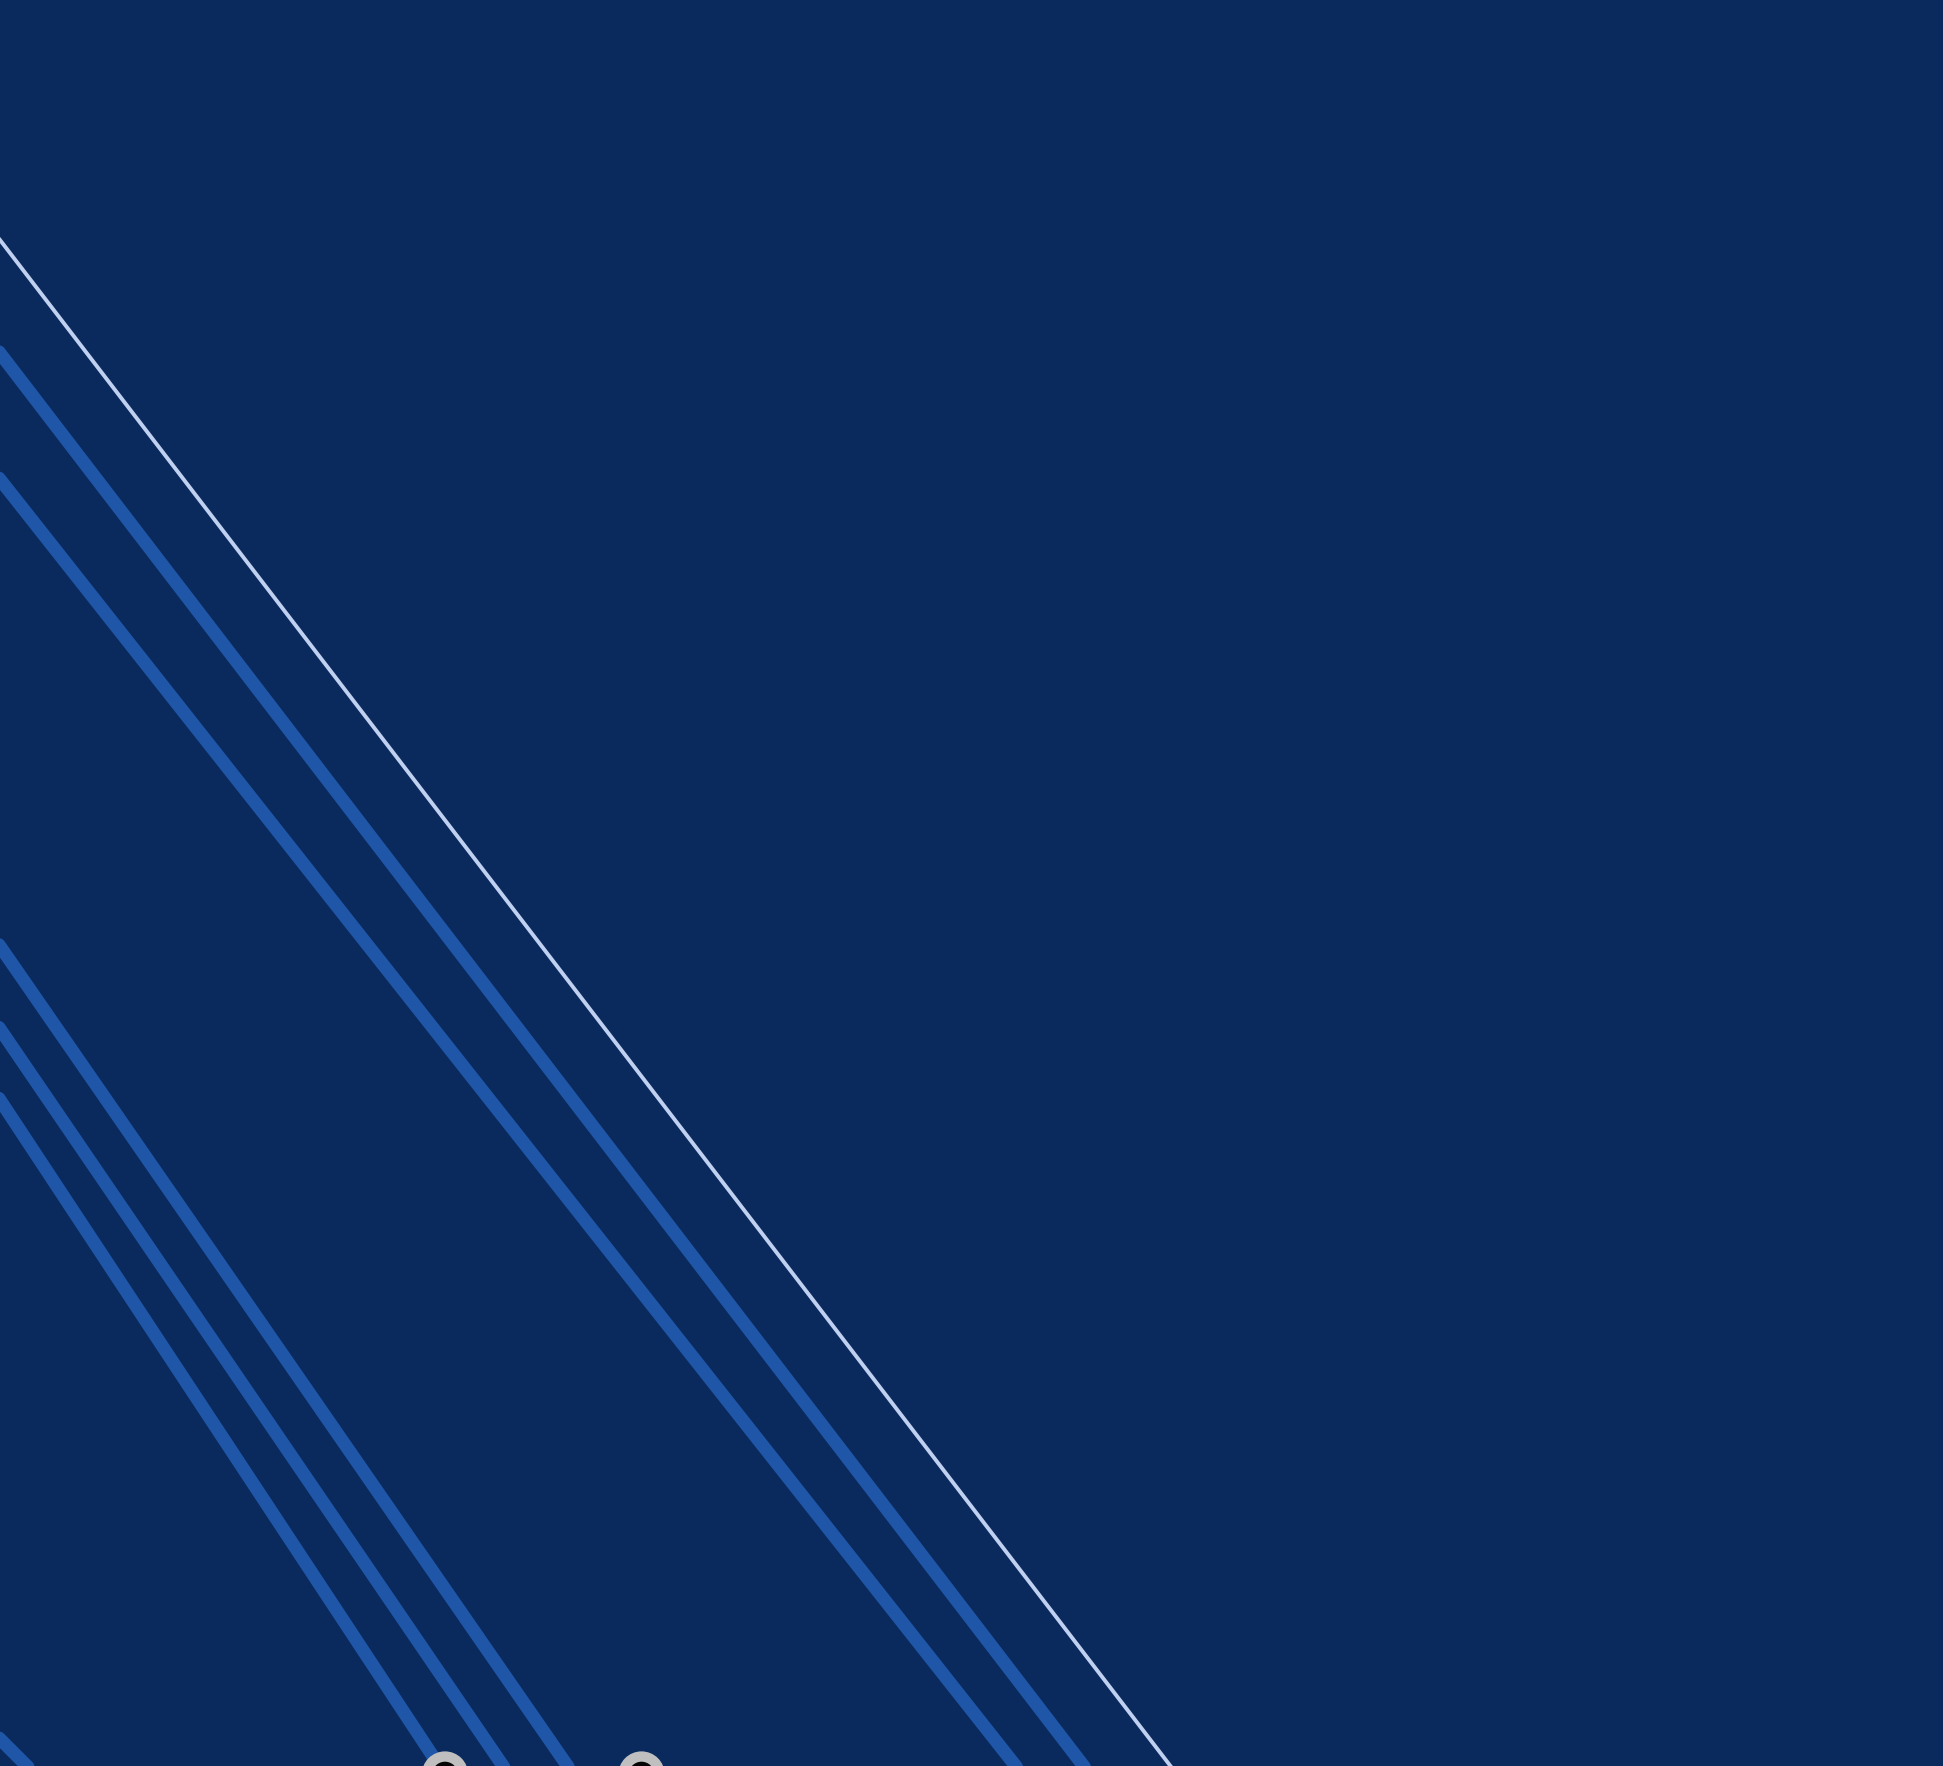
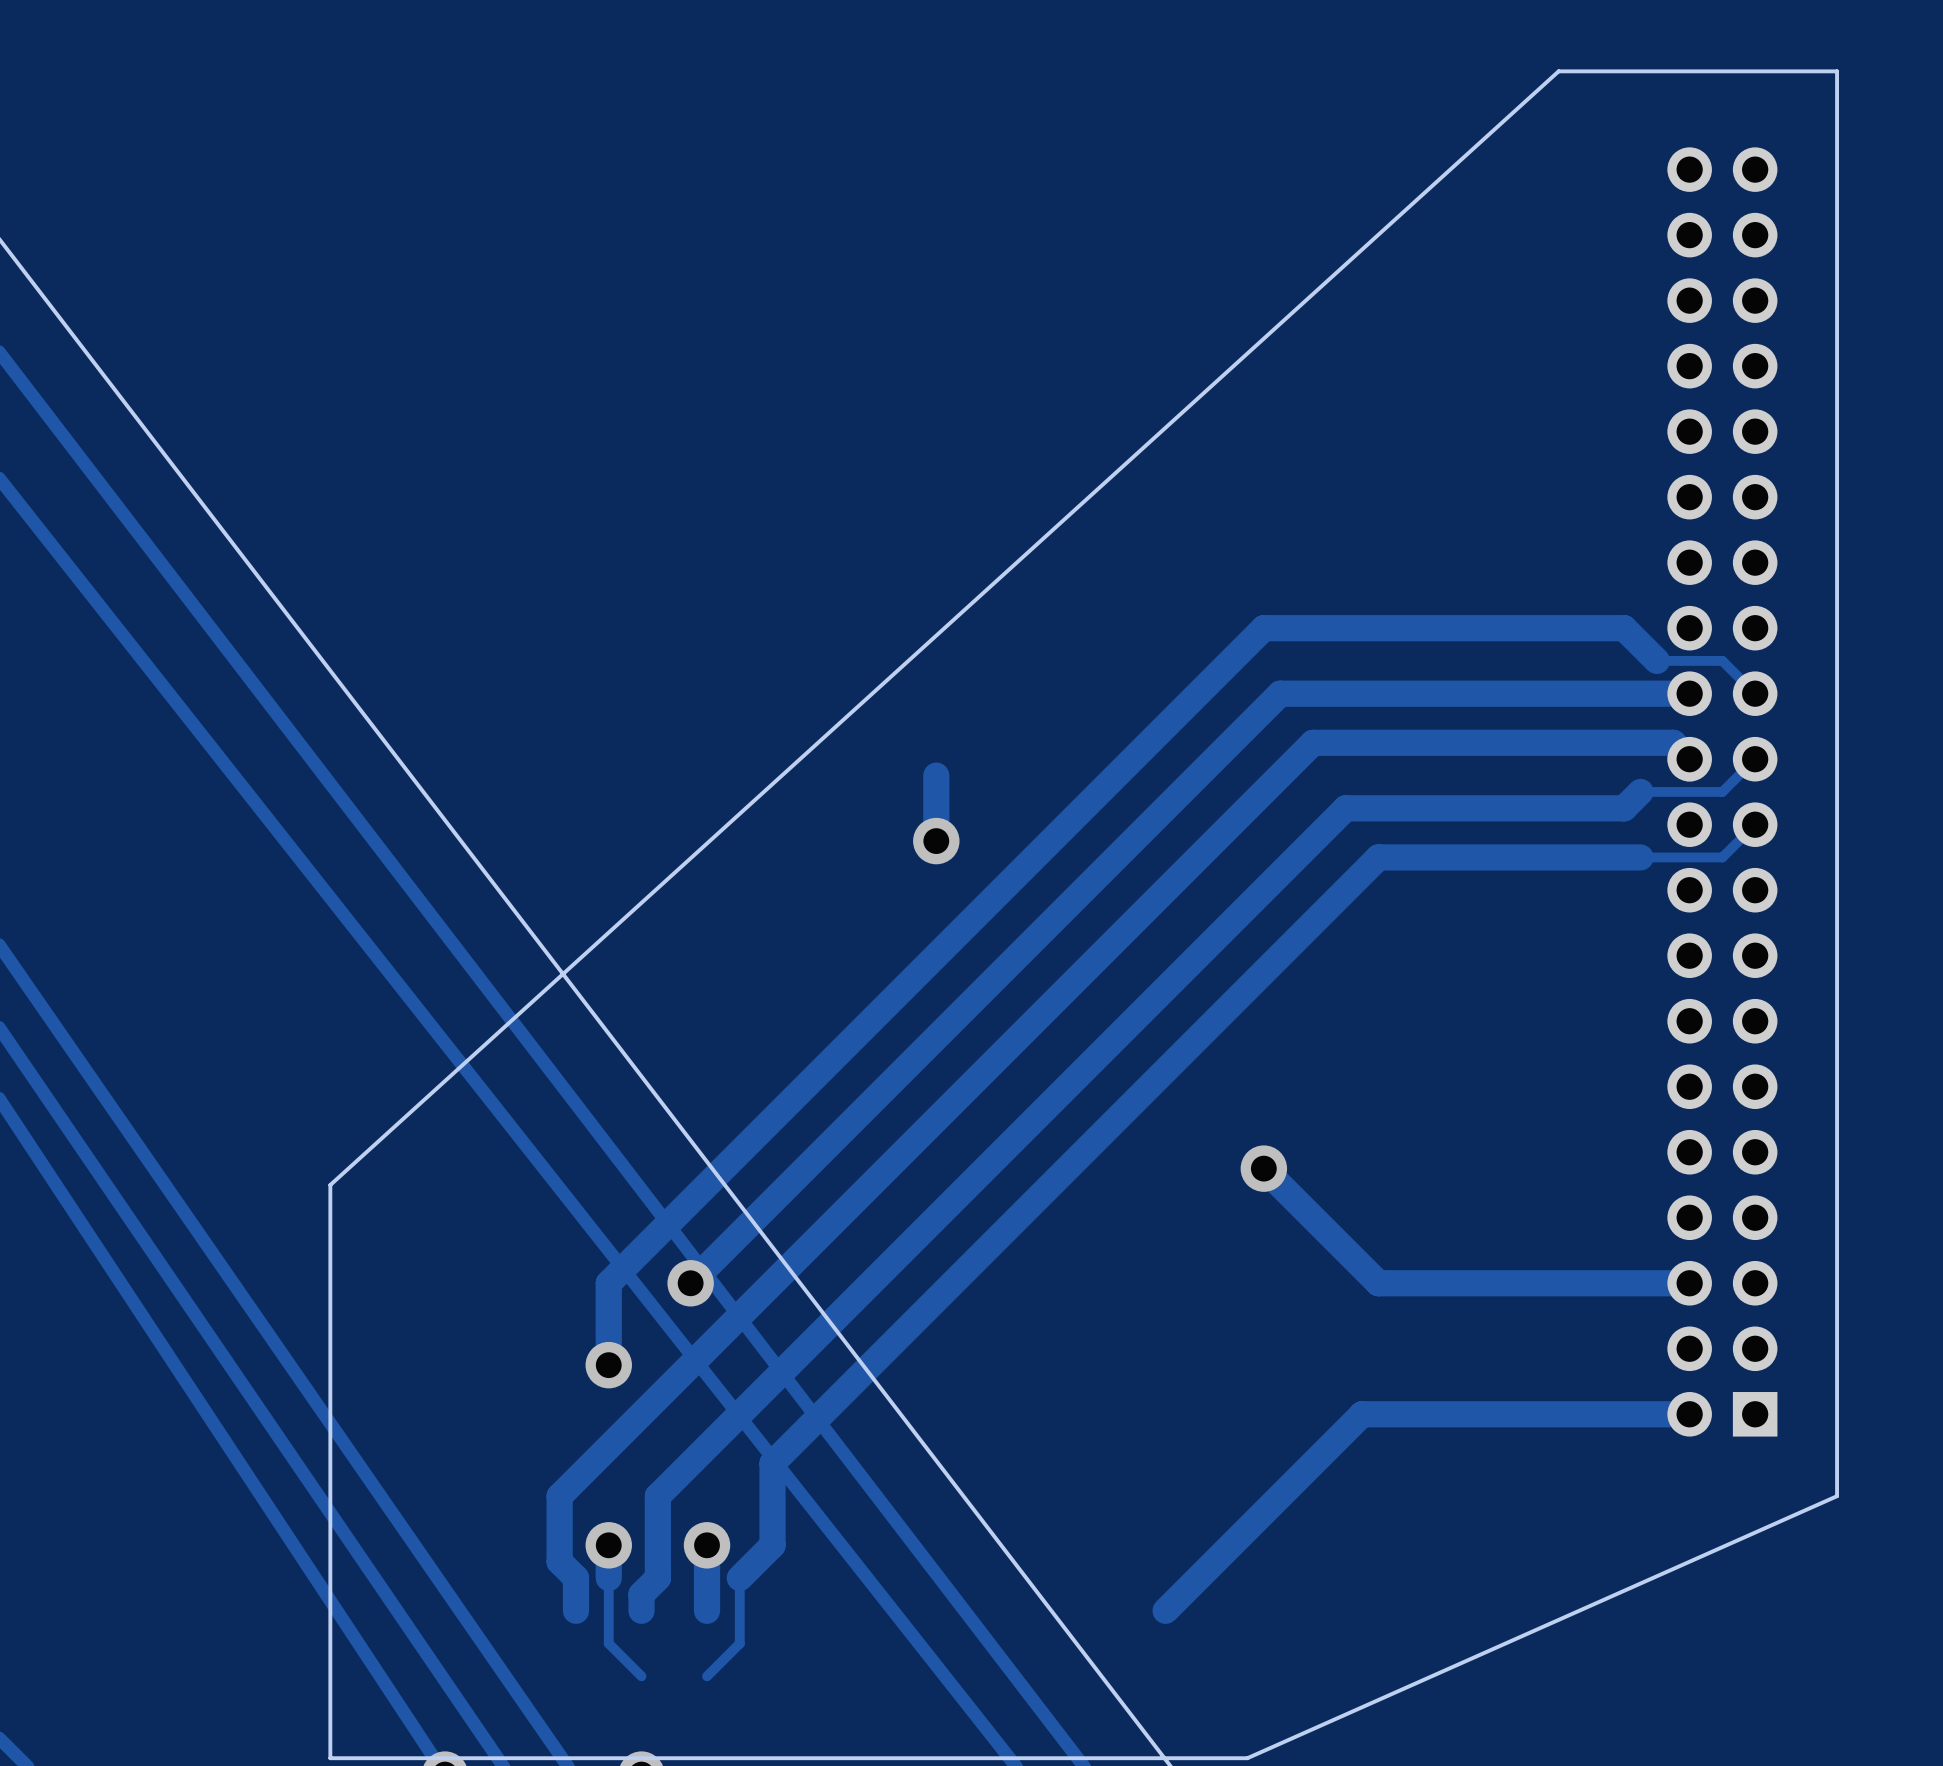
board edge: none -> (1558, 71) (1837, 71) (1837, 1496) (1247, 1758) (330, 1758) (330, 1185) (1558, 71)
track: none -> (1689, 693) (1280, 693) (690, 1283)
track: none -> (1755, 693) (1722, 660) (1656, 660) (1624, 628) (1263, 628) (608, 1283) (608, 1365)
track: none -> (1680, 759) (1689, 768) (1689, 759) (1673, 742) (1312, 742) (559, 1496) (559, 1561) (576, 1578) (576, 1610)
track: none -> (1755, 759) (1722, 791) (1640, 791) (1624, 808) (1345, 808) (657, 1496) (657, 1578) (641, 1594) (641, 1610)
track: none -> (936, 775) (936, 841)
part: none -> (1722, 791)
track: none -> (1755, 824) (1722, 857) (1378, 857) (772, 1463) (772, 1545) (739, 1578) (739, 1643) (707, 1676)
via: none -> (936, 841)
track: none -> (1263, 1168) (1378, 1283) (1689, 1283)
via: none -> (1263, 1168)
via: none -> (690, 1283)
via: none -> (608, 1365)
track: none -> (1689, 1414) (1362, 1414) (1165, 1610)
track: none -> (608, 1545) (608, 1643) (641, 1676)
via: none -> (608, 1545)
track: none -> (707, 1545) (707, 1610)
via: none -> (707, 1545)

